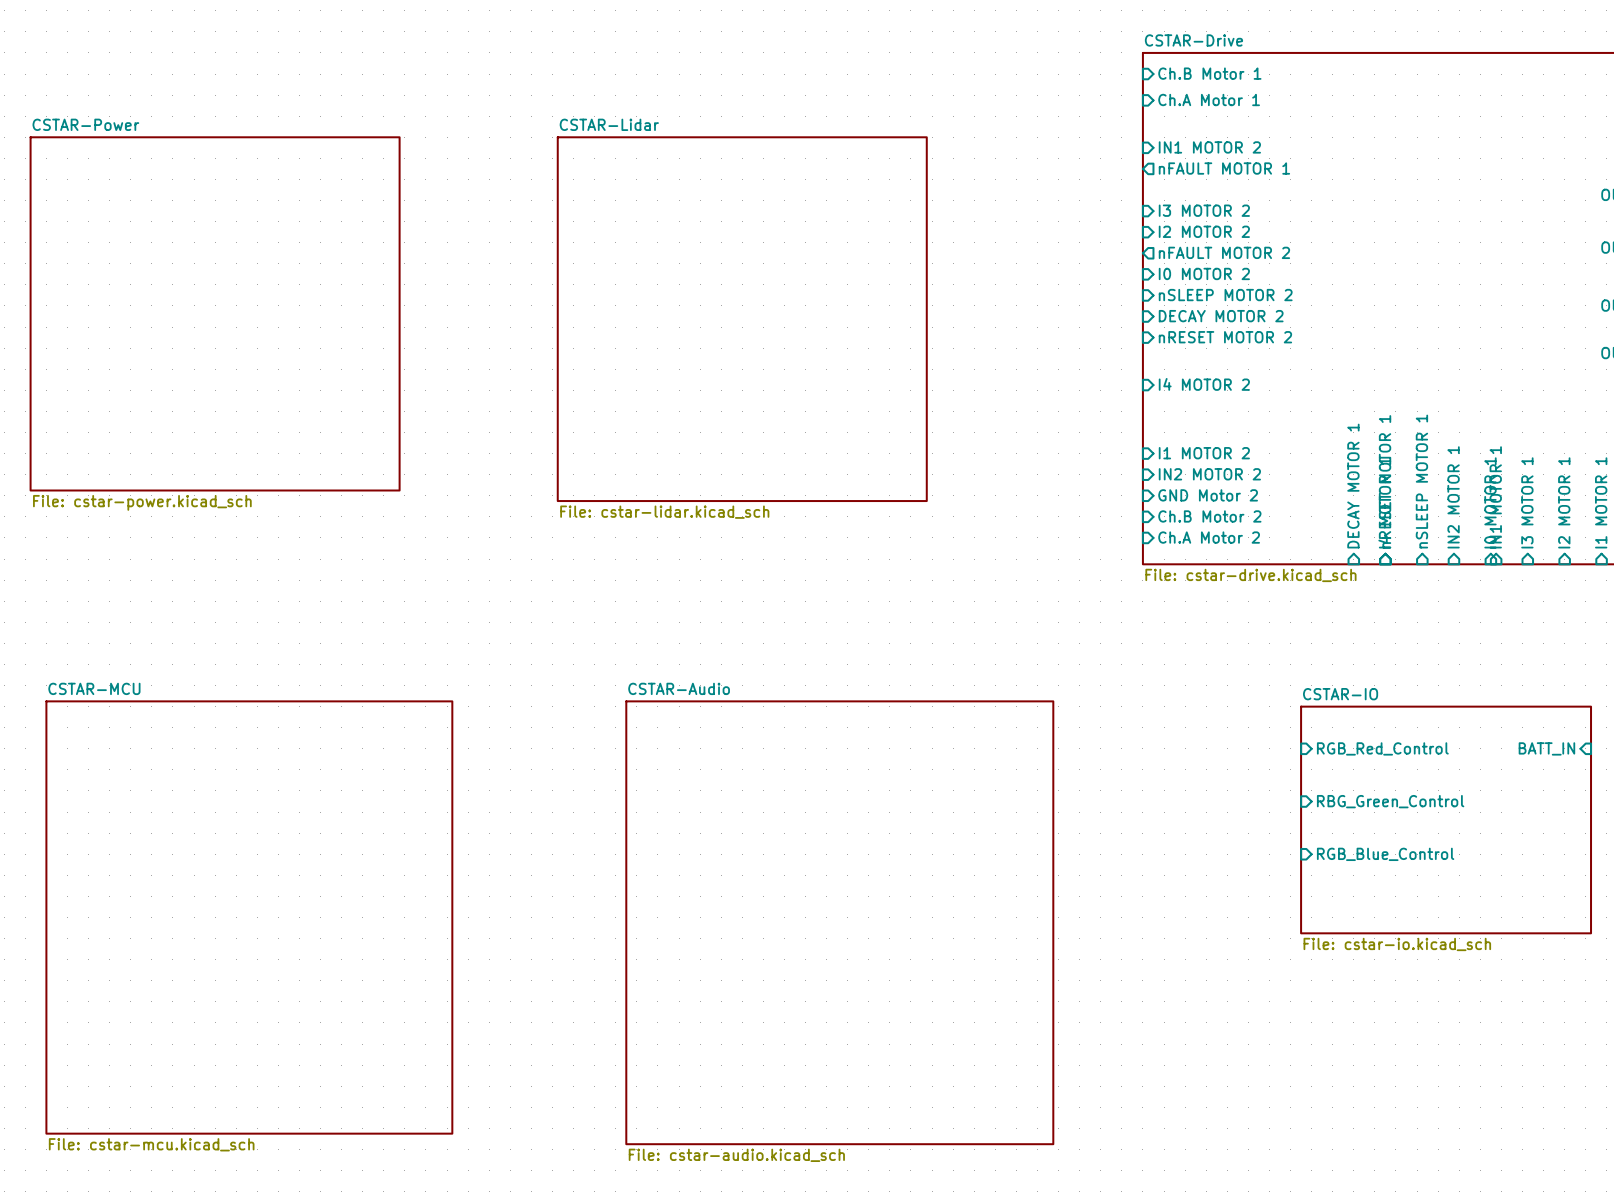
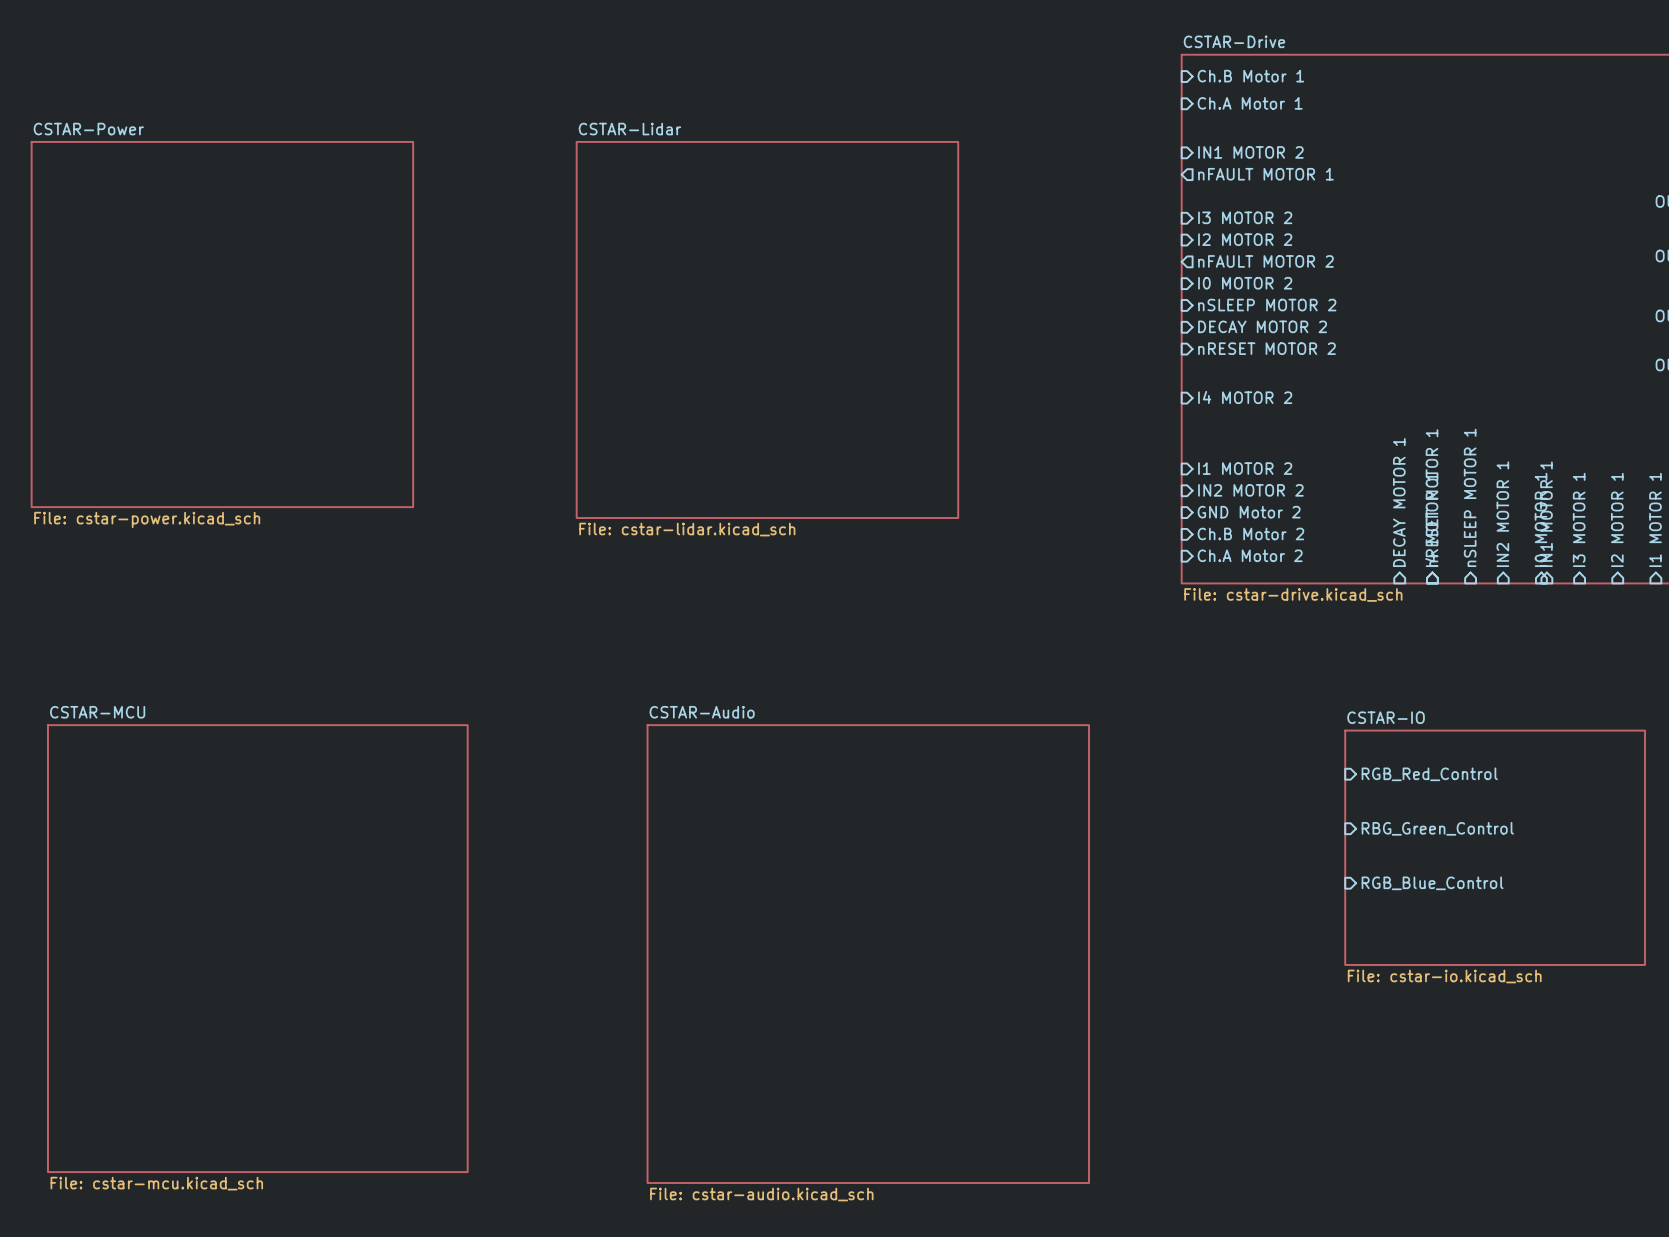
sheet pin: BATT_IN (1546, 748) -> none

